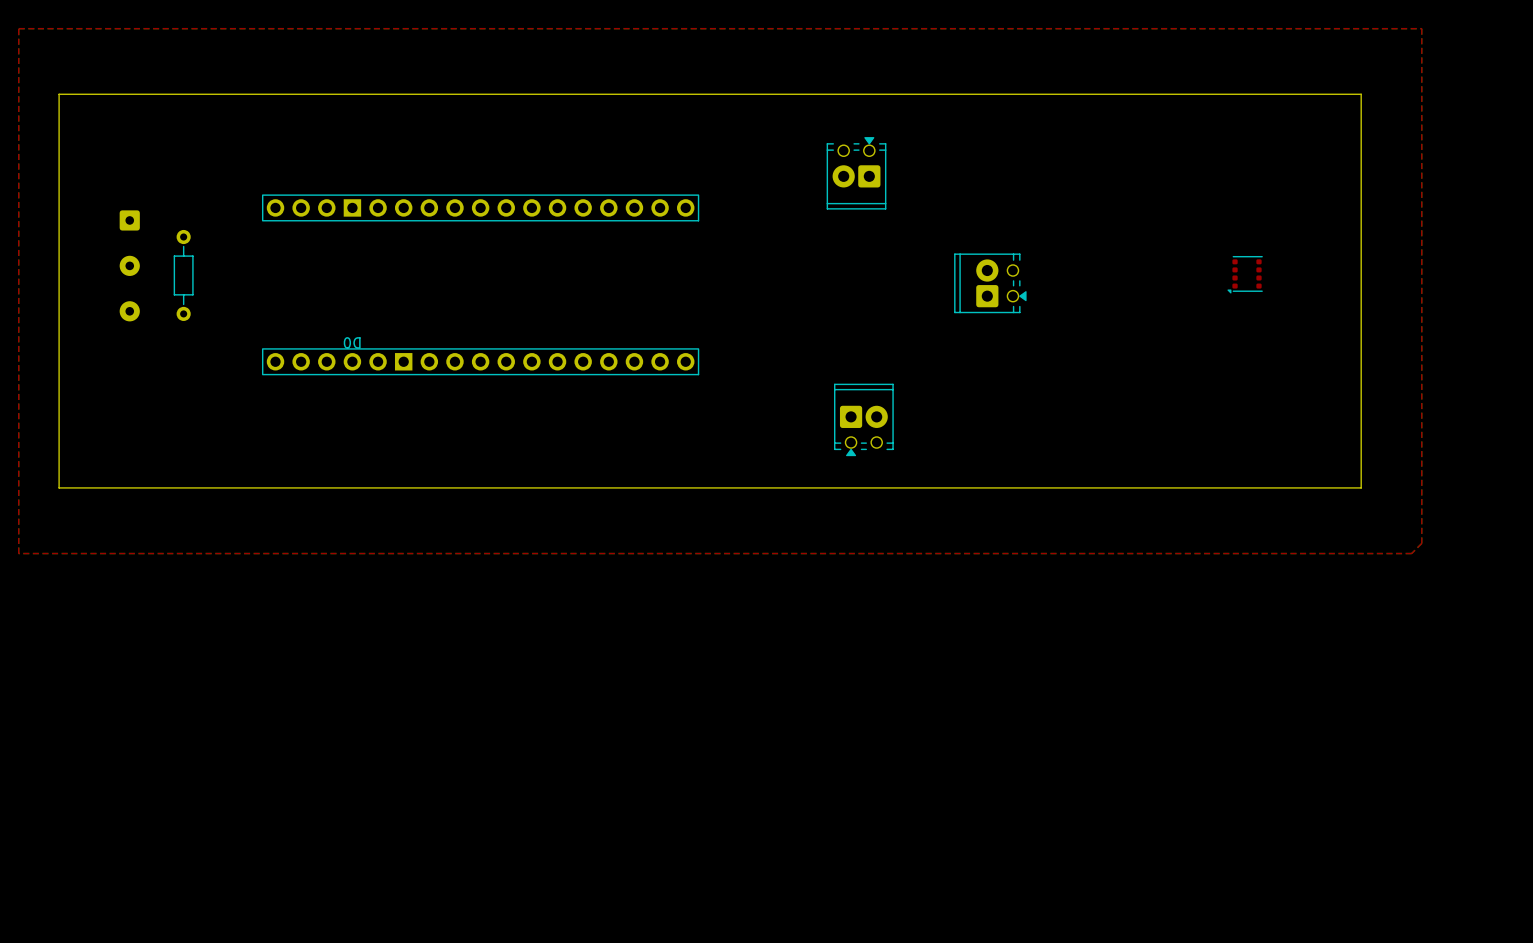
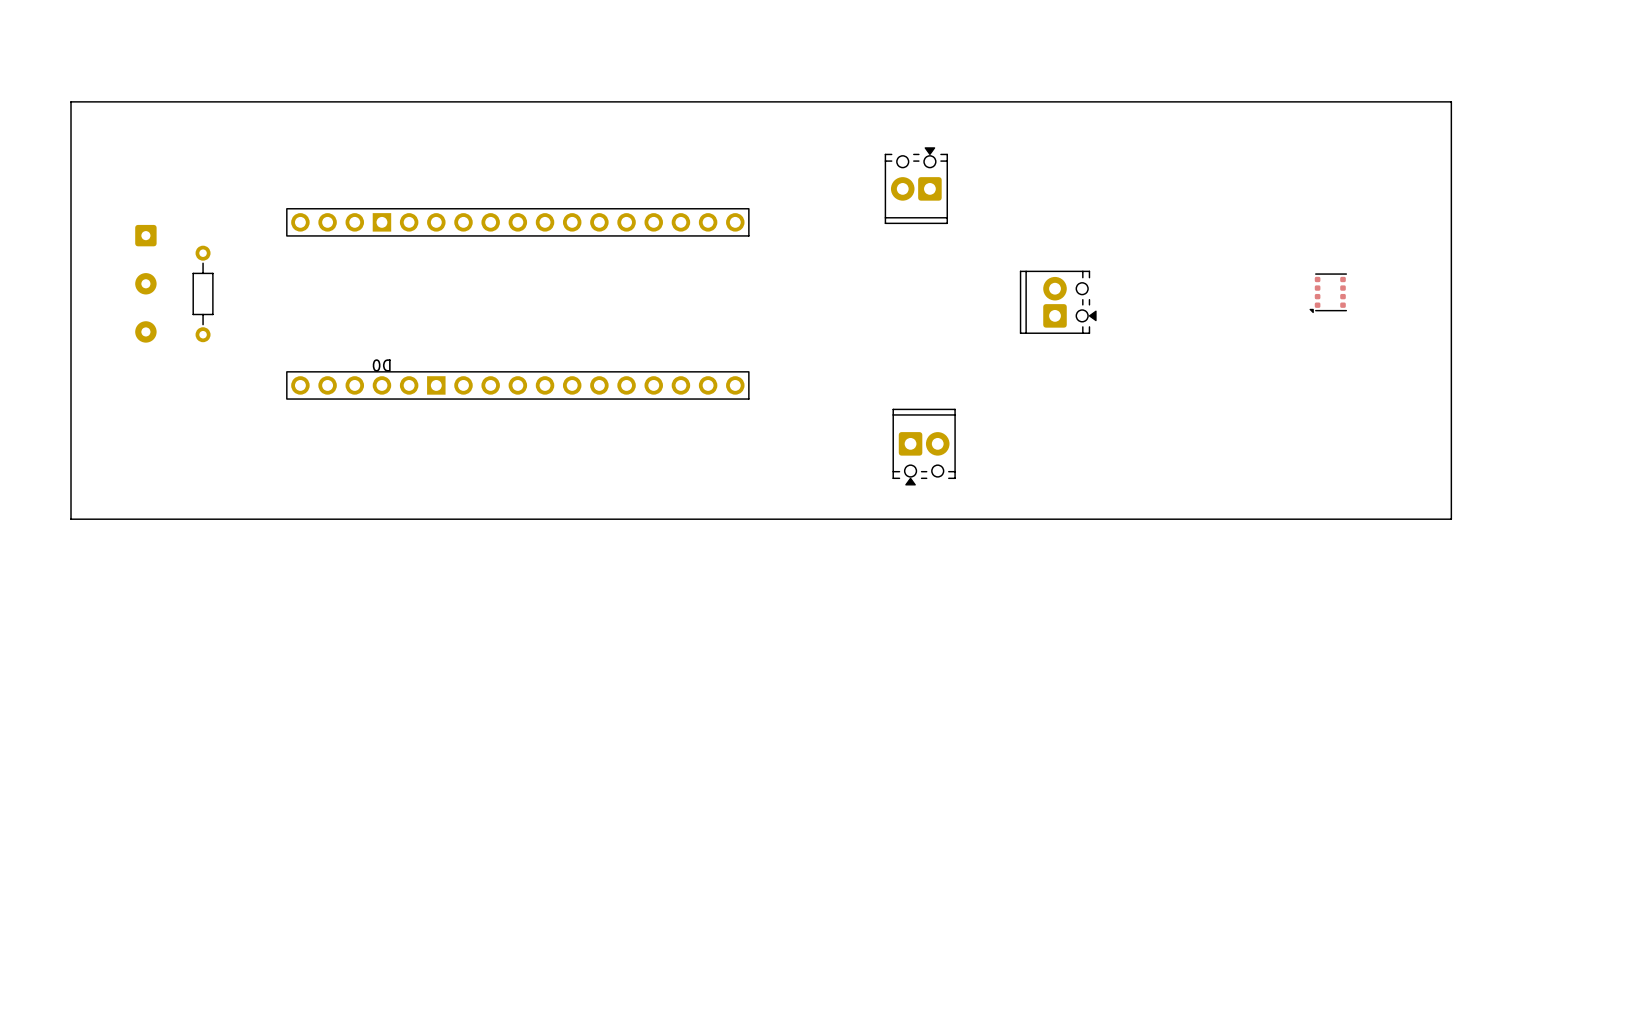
top zone outline: (18, 28) (18, 553) (1411, 553) (1421, 543) (1421, 28) (18, 28) -> none

